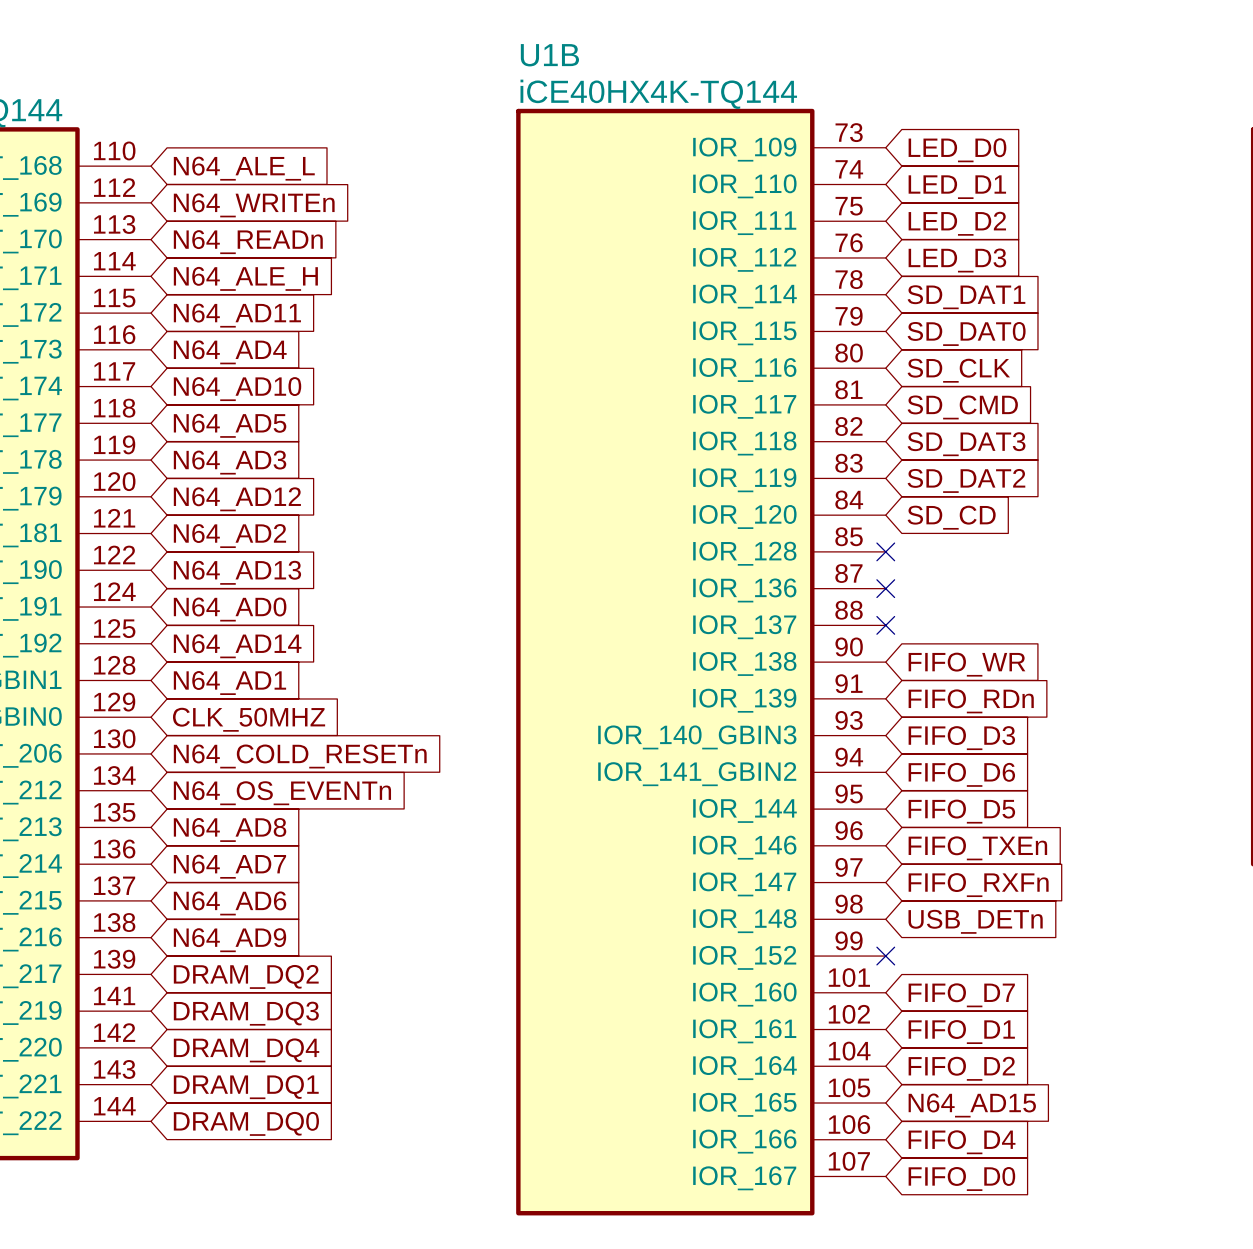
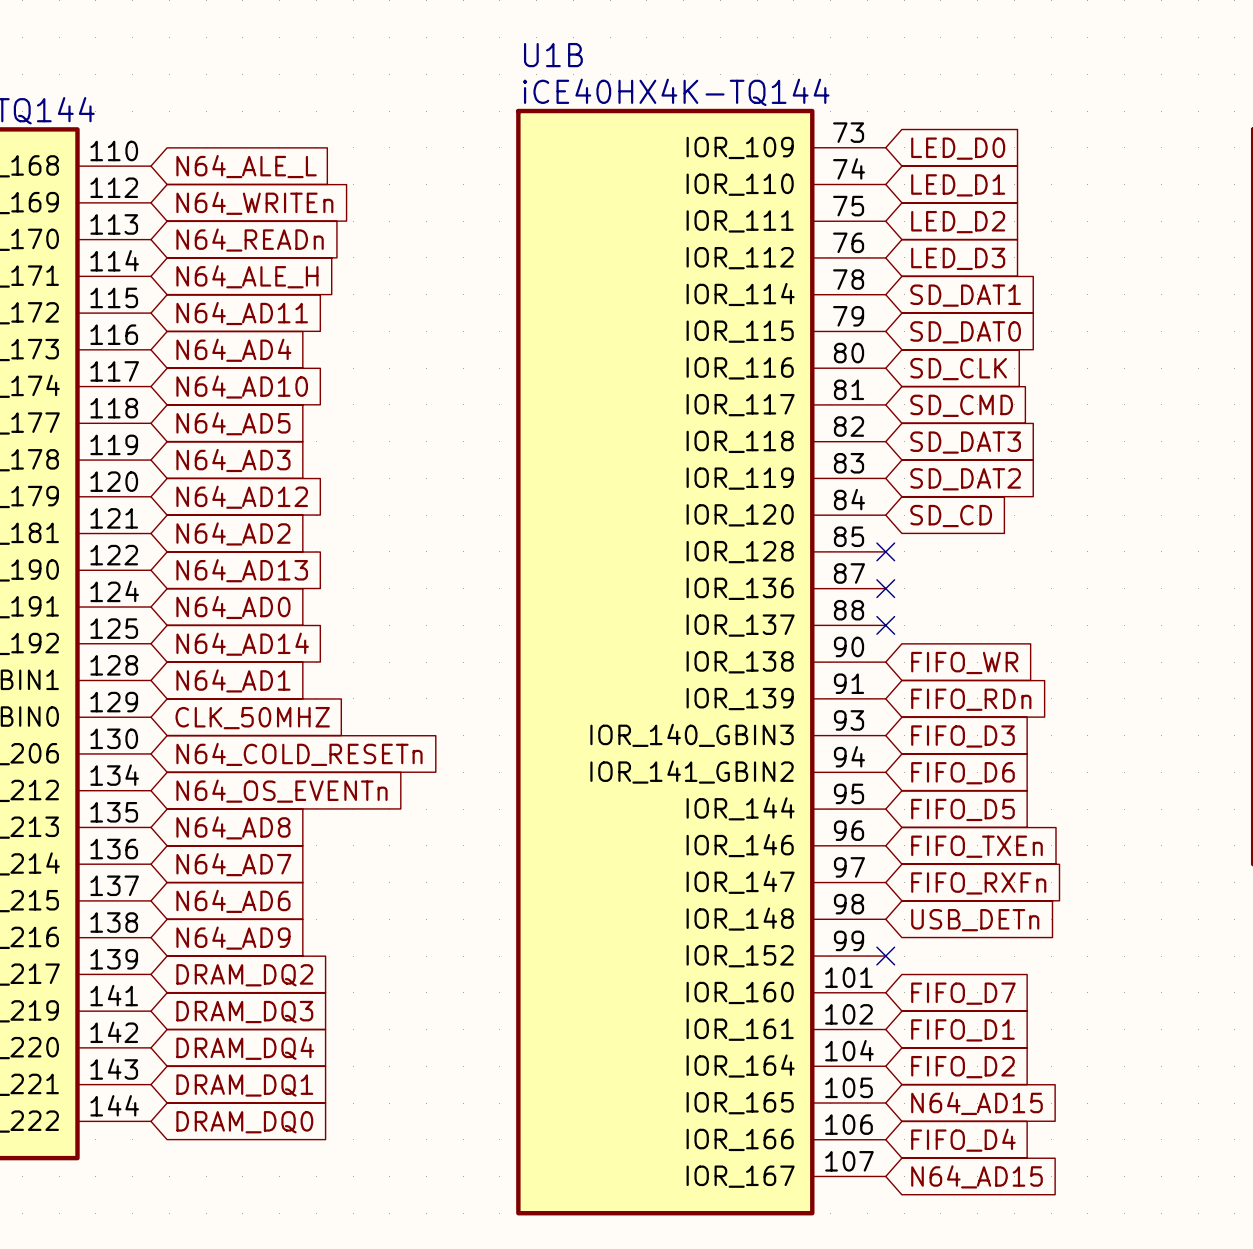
global label: FIFO_D0 (961, 1178) -> N64_AD15 (976, 1176)

